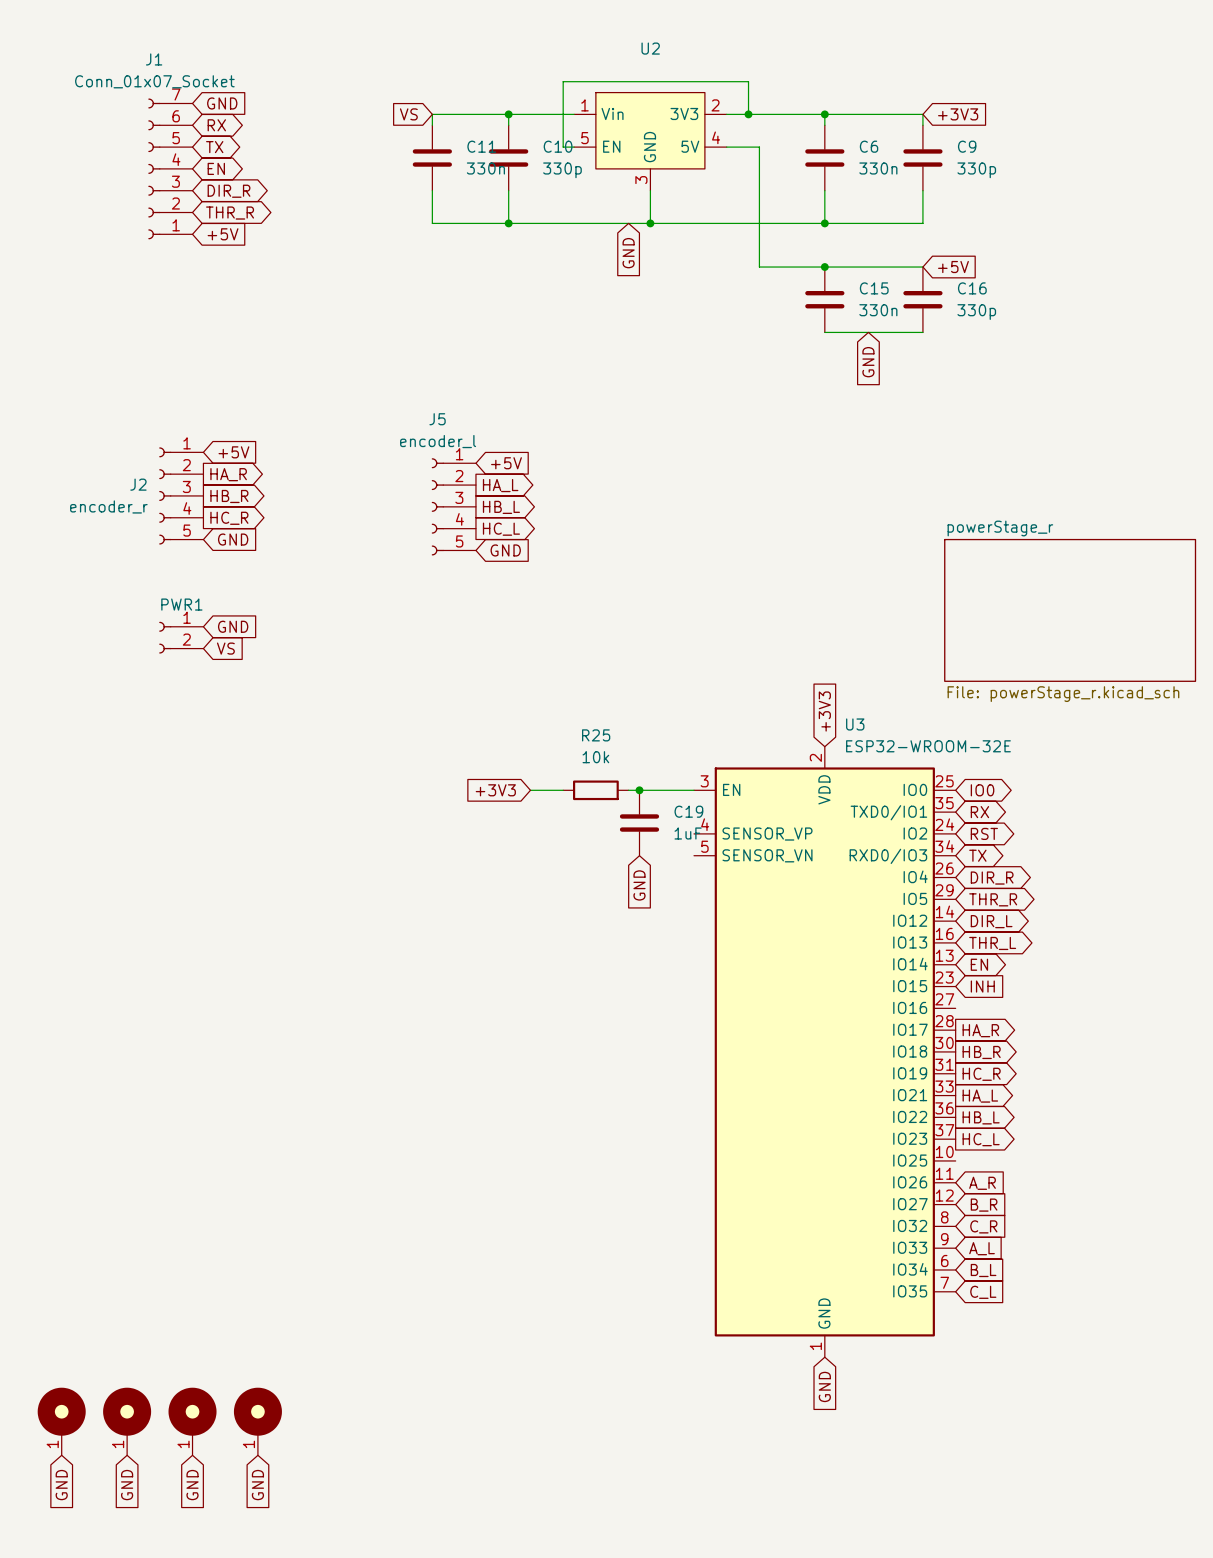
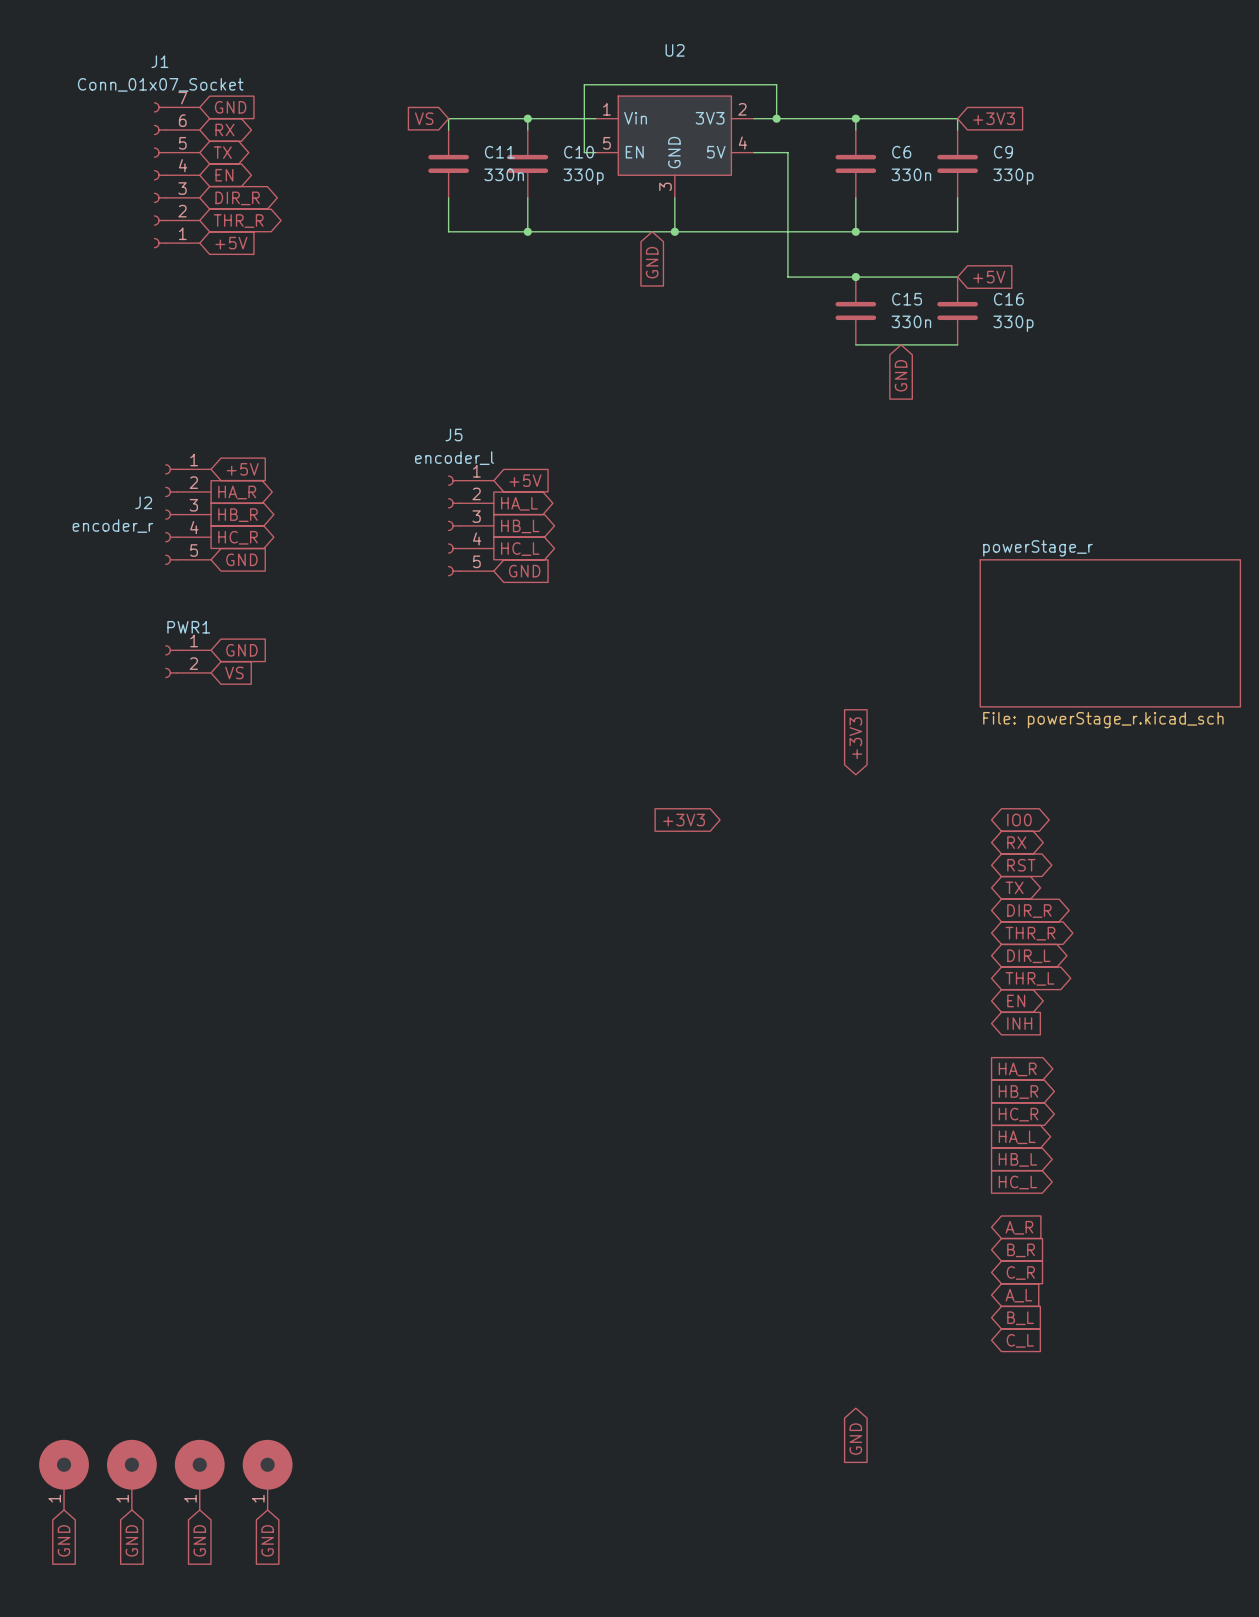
global label position: +3V3 (495, 790) -> +3V3 (684, 820)
wire: (530, 790) (563, 790) -> none
R25: 10k (595, 790) -> none
wire: (628, 790) (694, 790) -> none
junction: (639, 790) -> none
C19: 1uF (639, 823) -> none
global label: GND (639, 885) -> none
U3: ESP32-WROOM-32E (824, 1051) -> none

